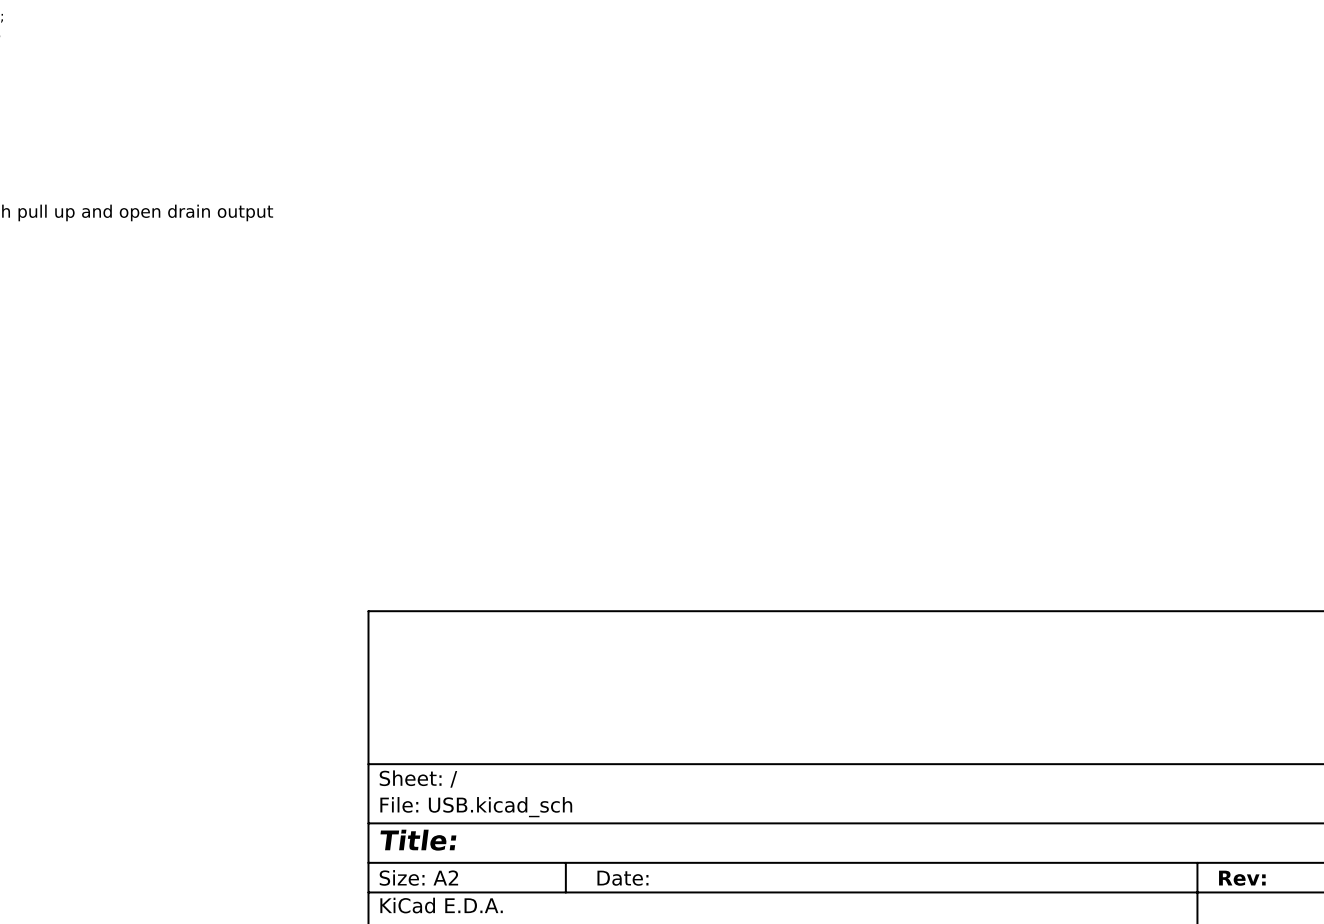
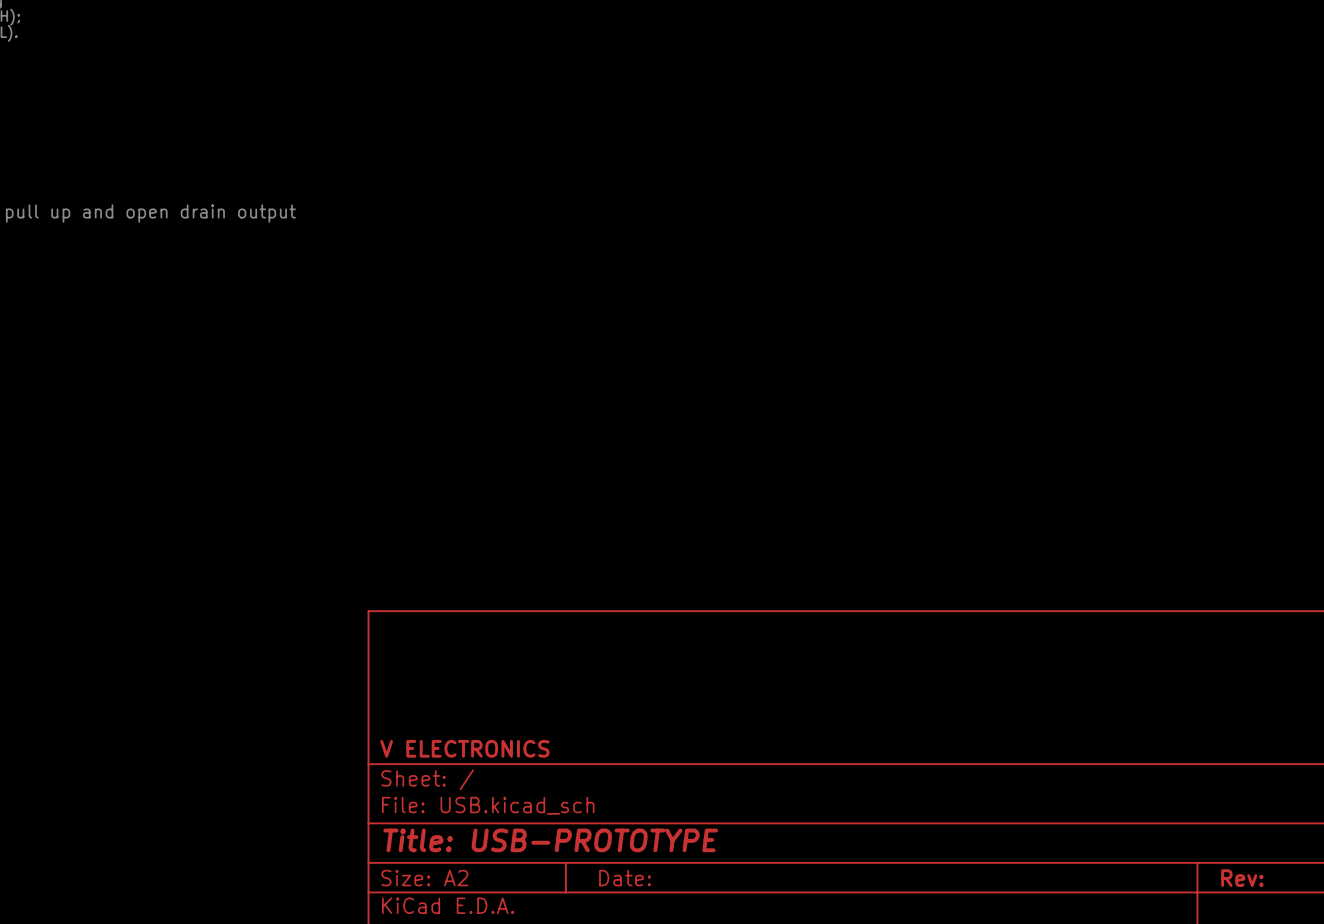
title block: none -> V ELECTRONICS (464, 748)
title block: Title: (418, 840) -> Title: USB-PROTOTYPE (550, 840)

